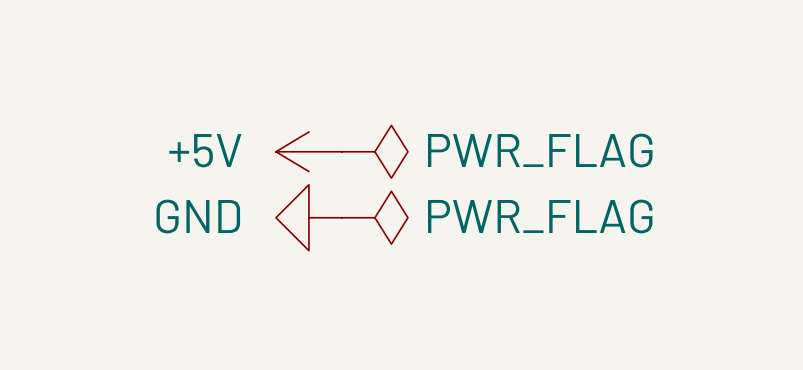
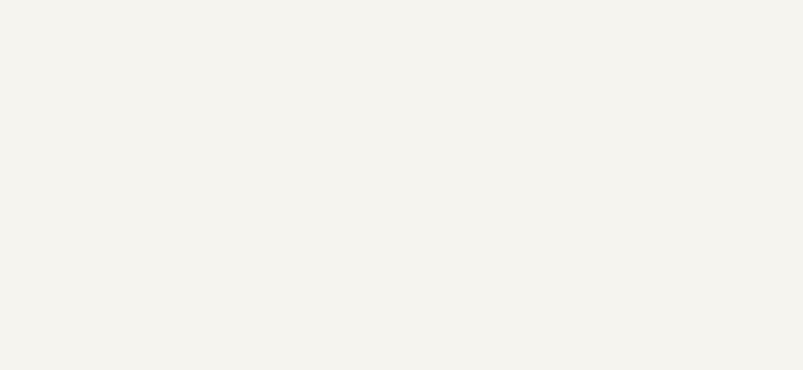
power symbol: +5V (308, 151) -> none
power symbol: PWR_FLAG (374, 151) -> none
power symbol: GND (308, 217) -> none
power symbol: PWR_FLAG (374, 217) -> none

